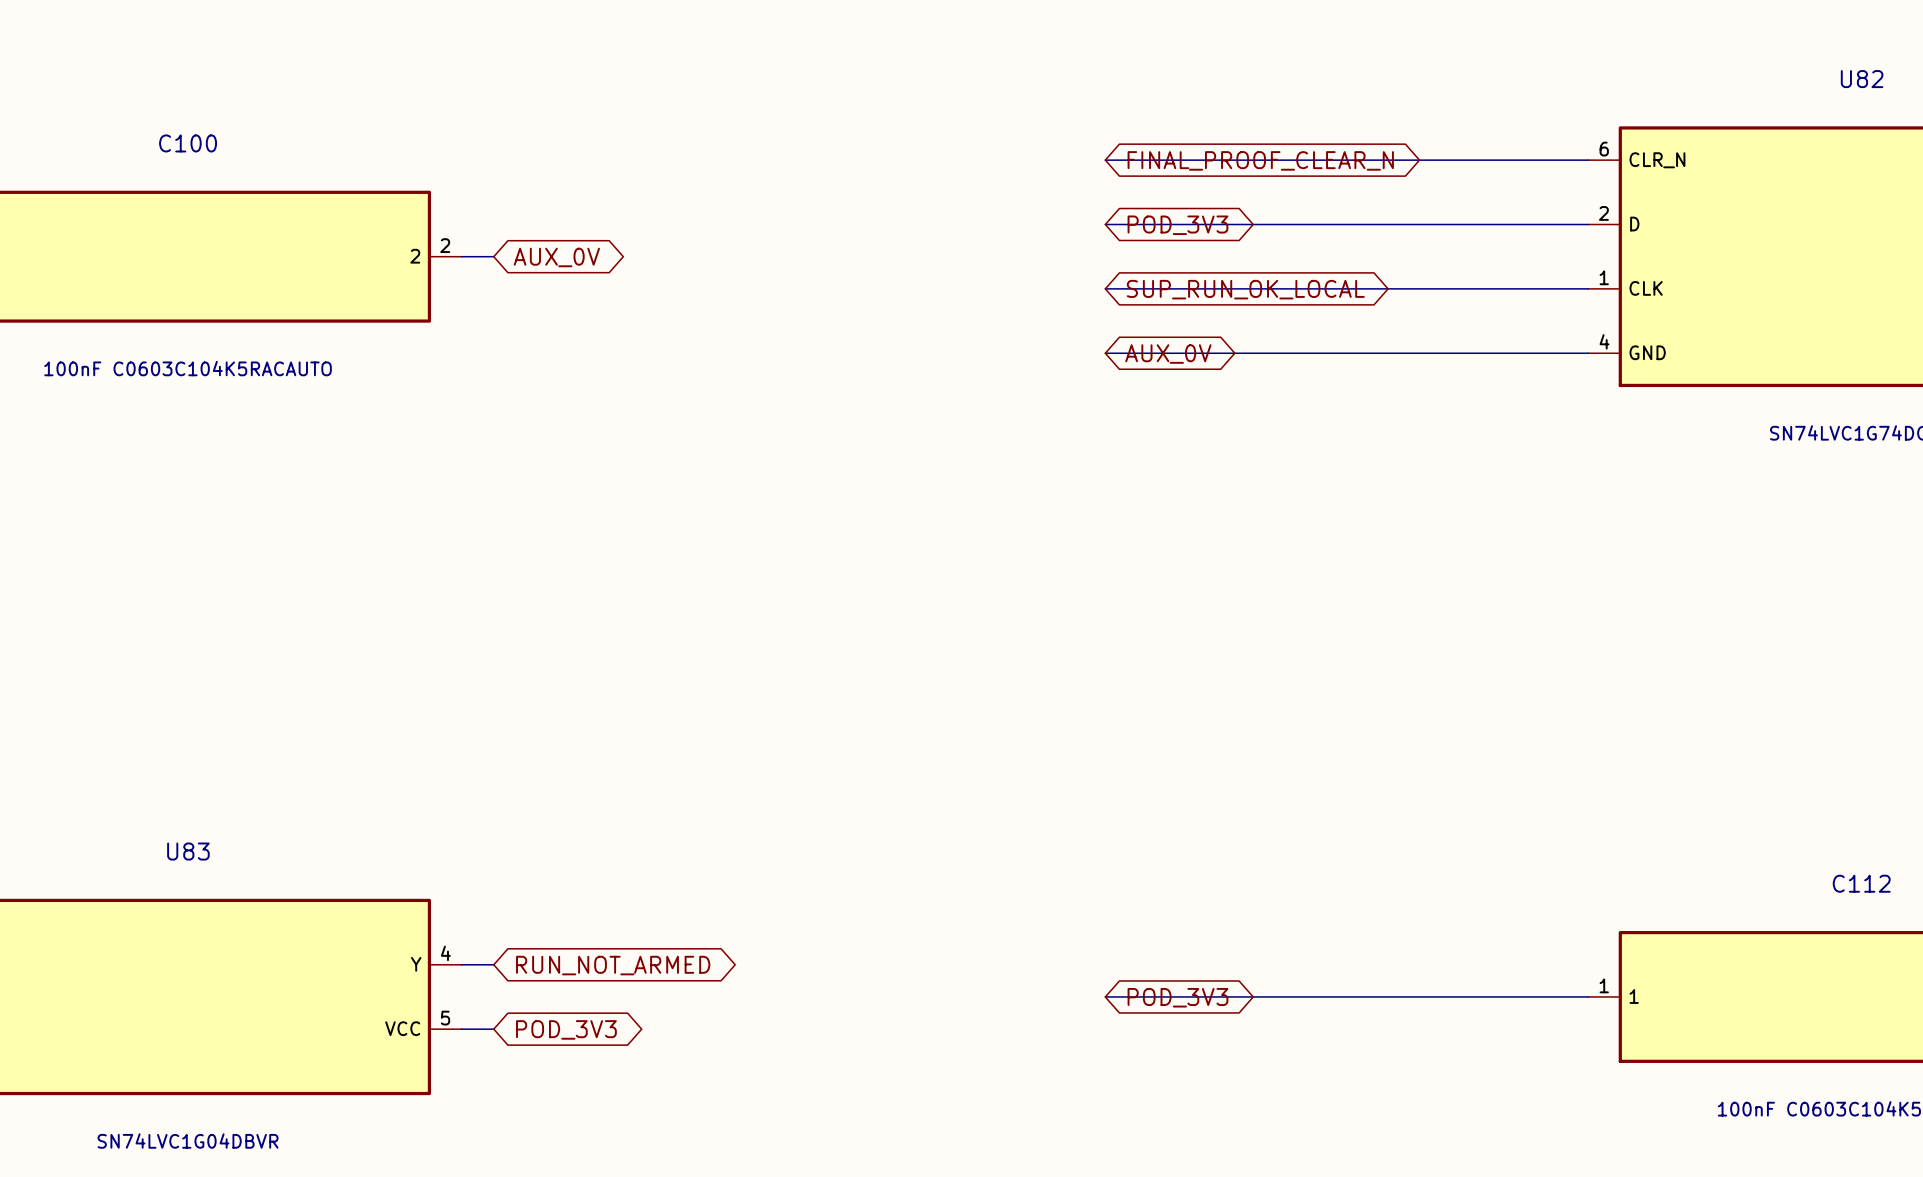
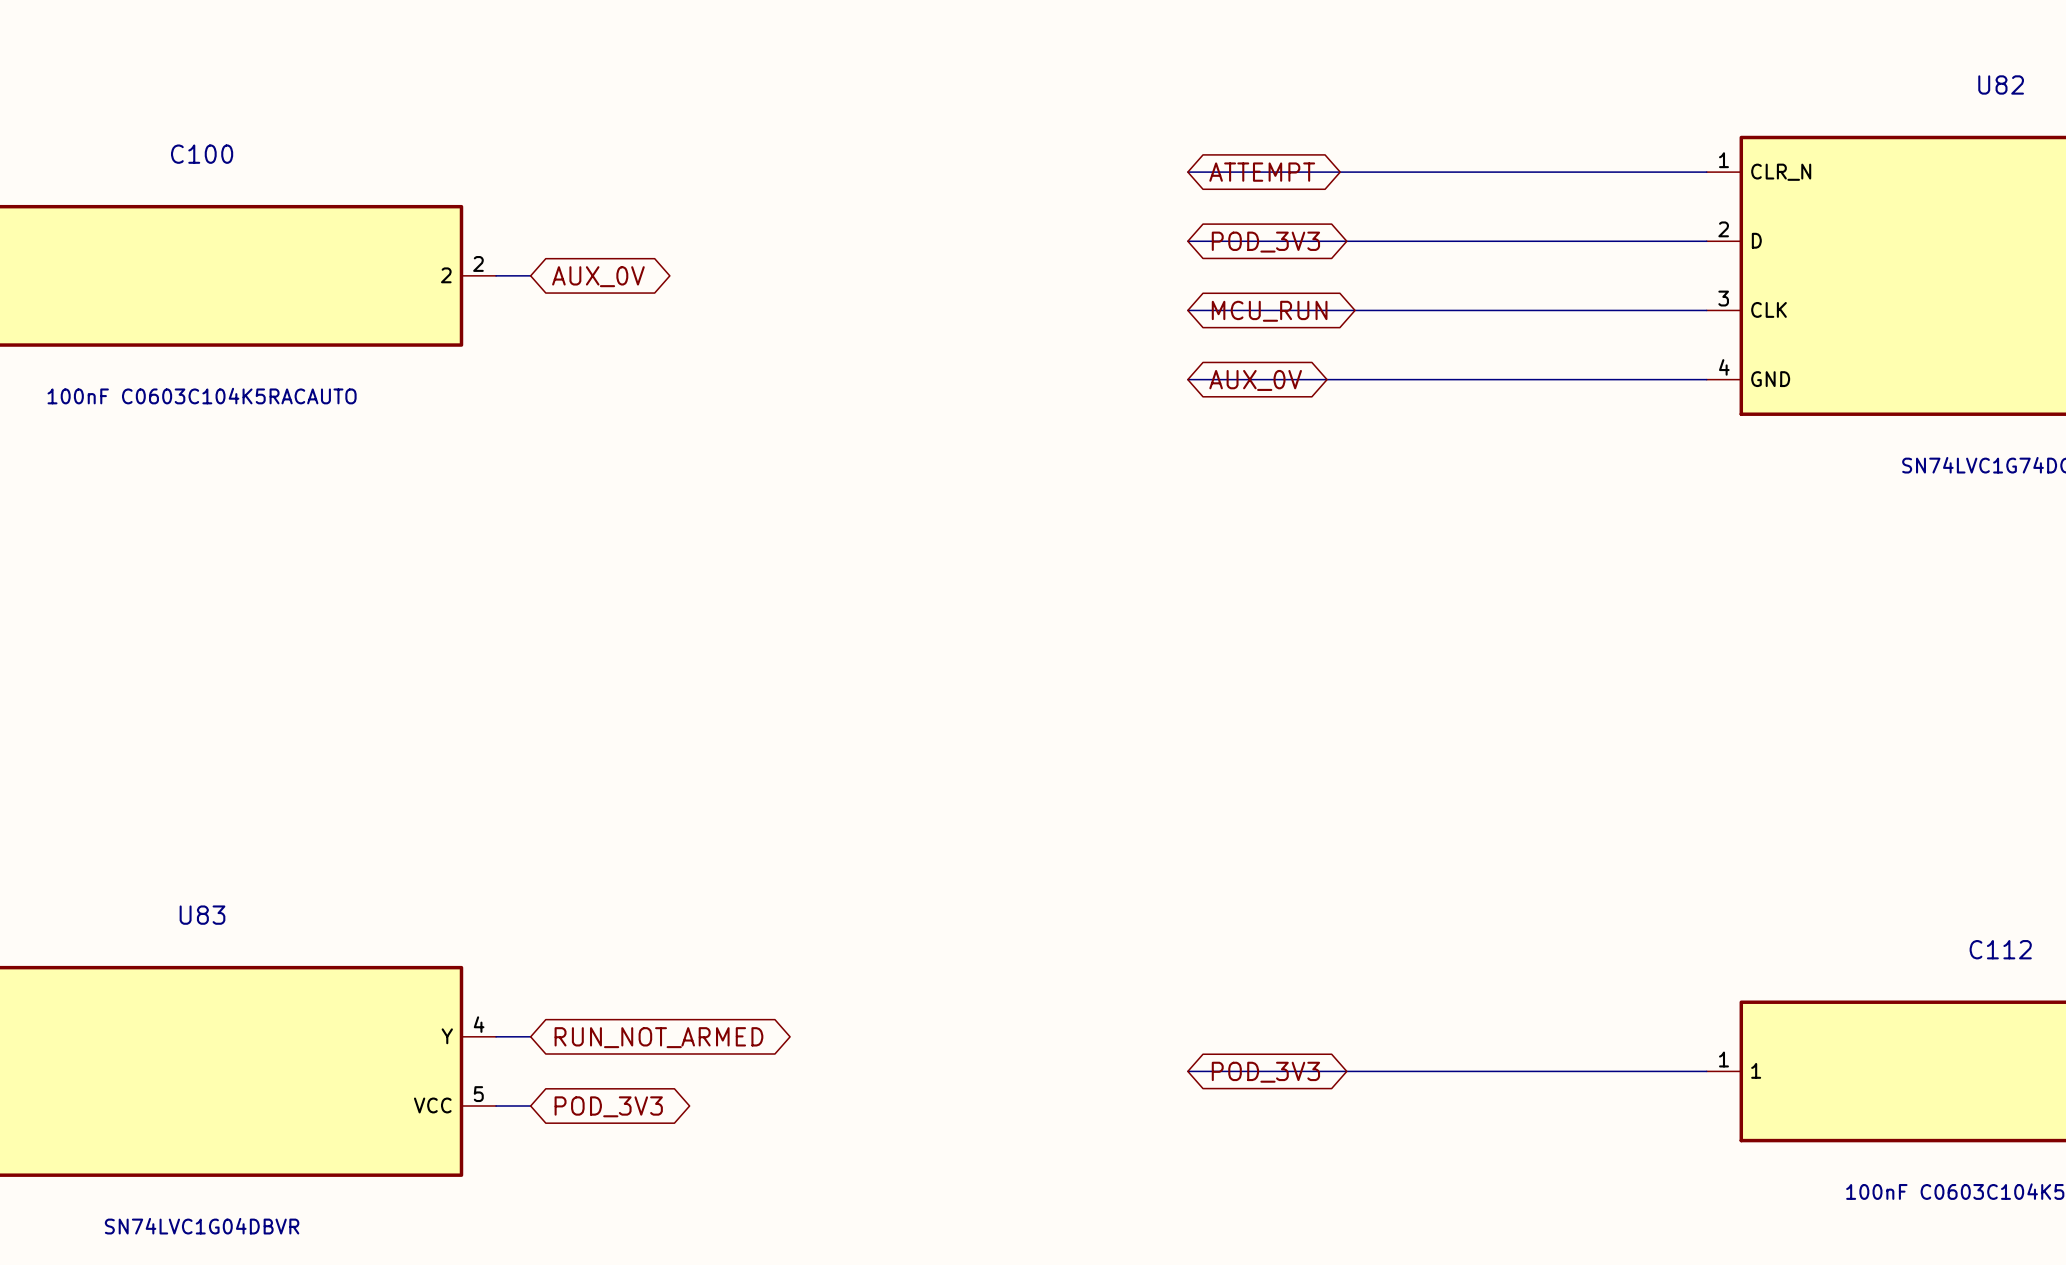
U82 pin number: 6 (1604, 149) -> 1 (1723, 160)
global label: FINAL_PROOF_CLEAR_N (1260, 160) -> ATTEMPT (1262, 172)
U82 pin number: 1 (1604, 277) -> 3 (1723, 298)
global label: SUP_RUN_OK_LOCAL (1245, 289) -> MCU_RUN (1269, 311)

